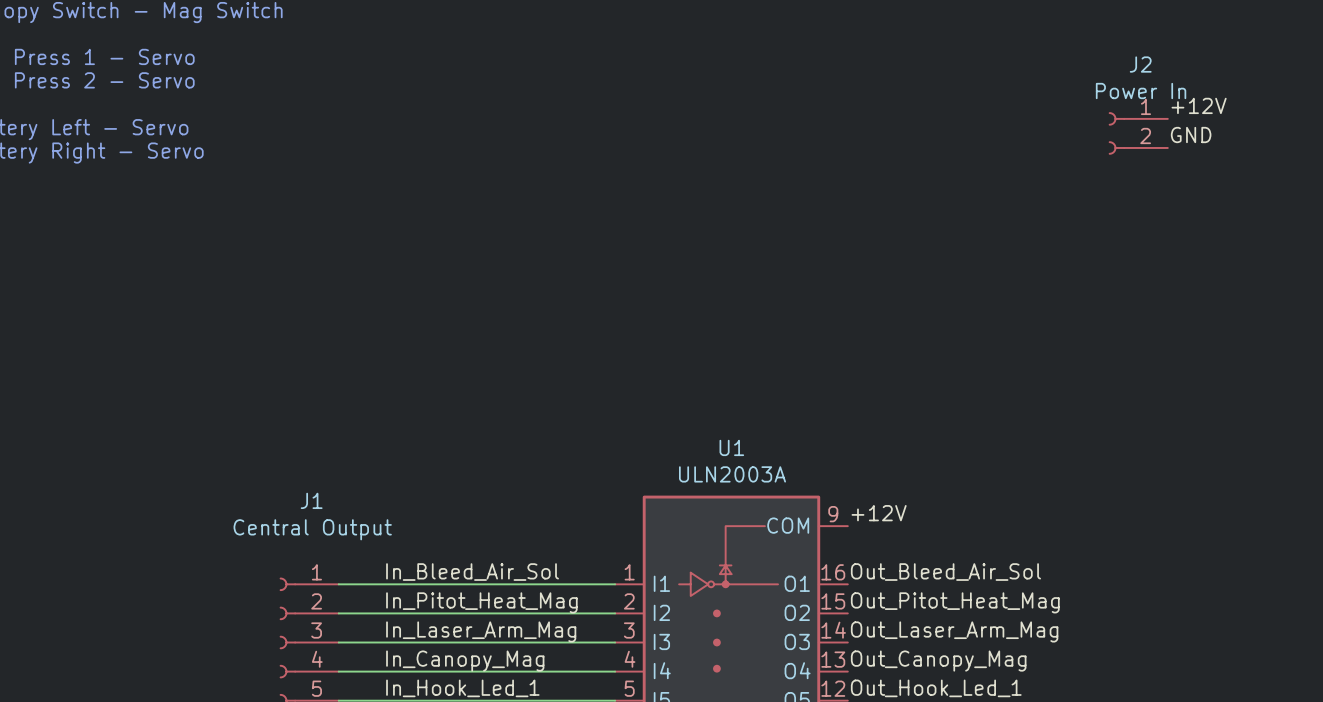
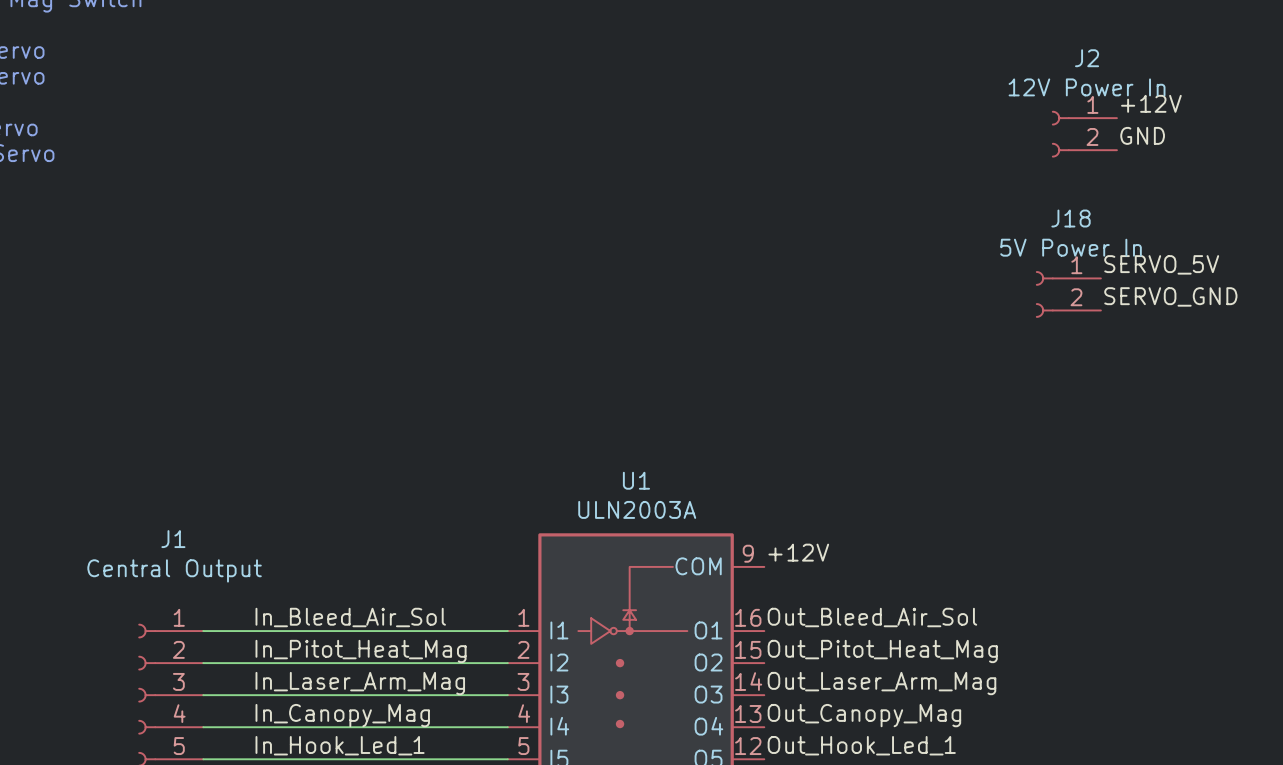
J2 value: Power In (1141, 91) -> 12V Power In (1087, 87)
label: none -> SERVO_5V (1161, 264)
J18: none -> 5V Power In (1068, 294)
label: none -> SERVO_GND (1170, 296)

